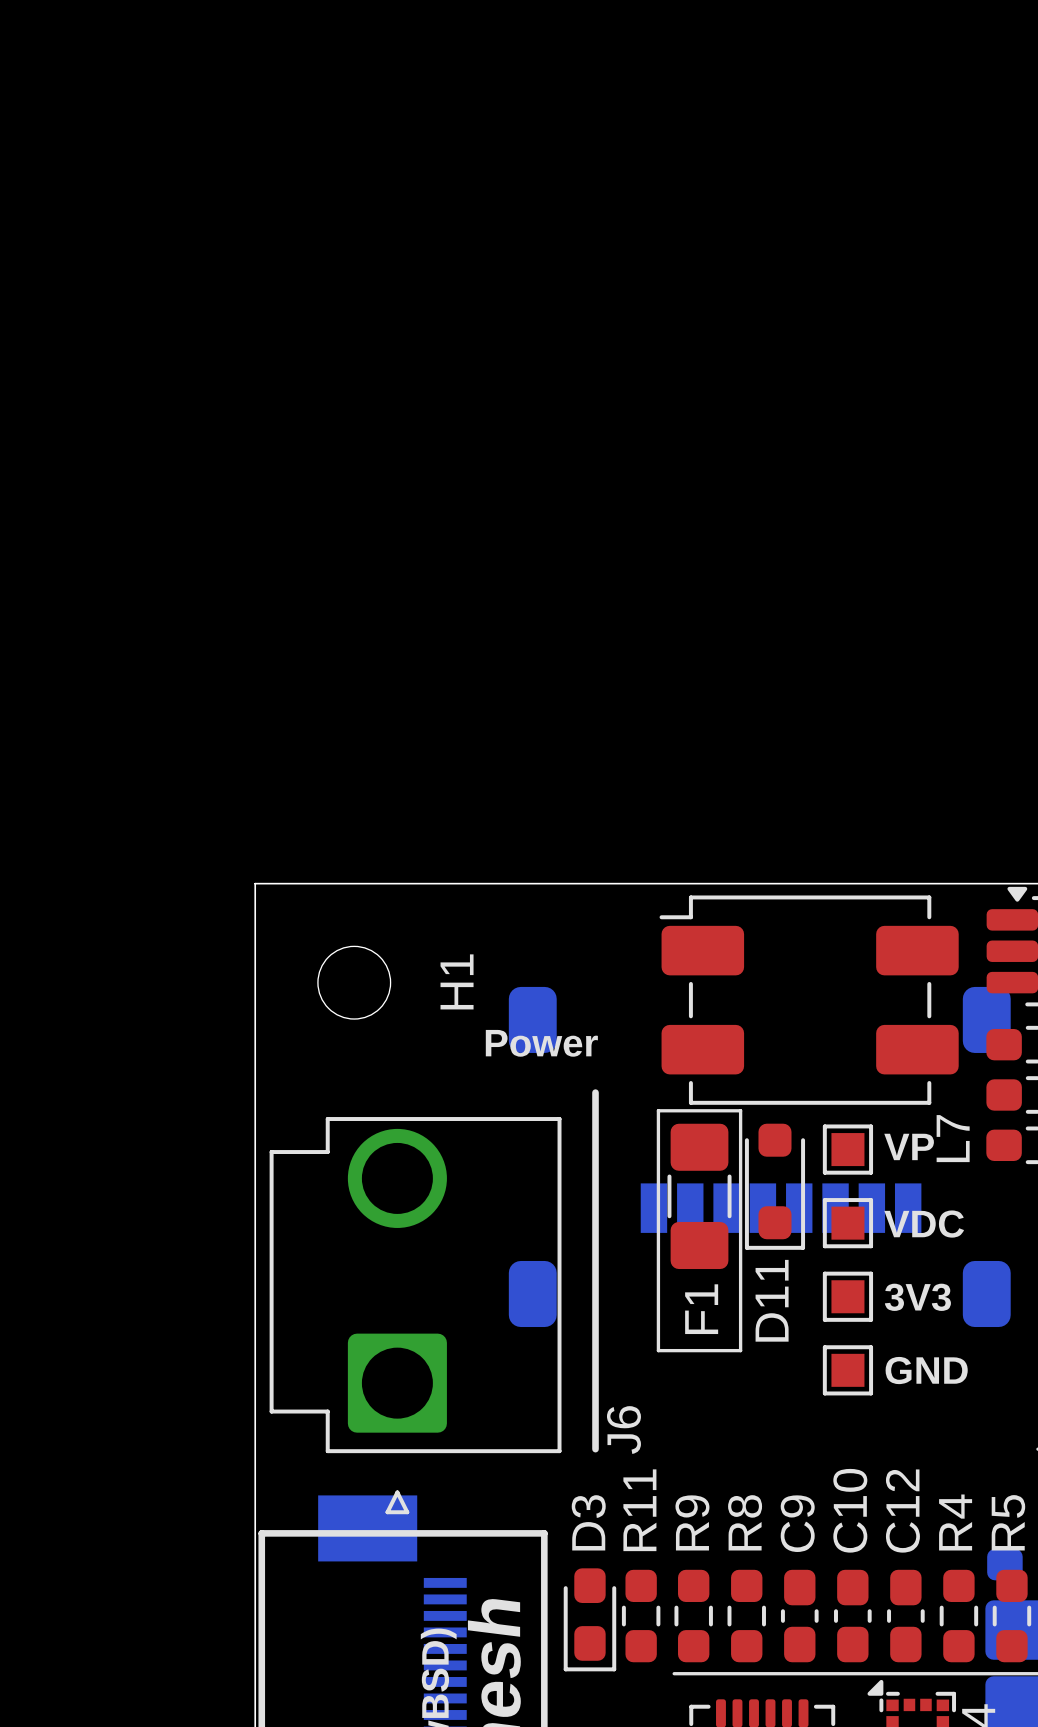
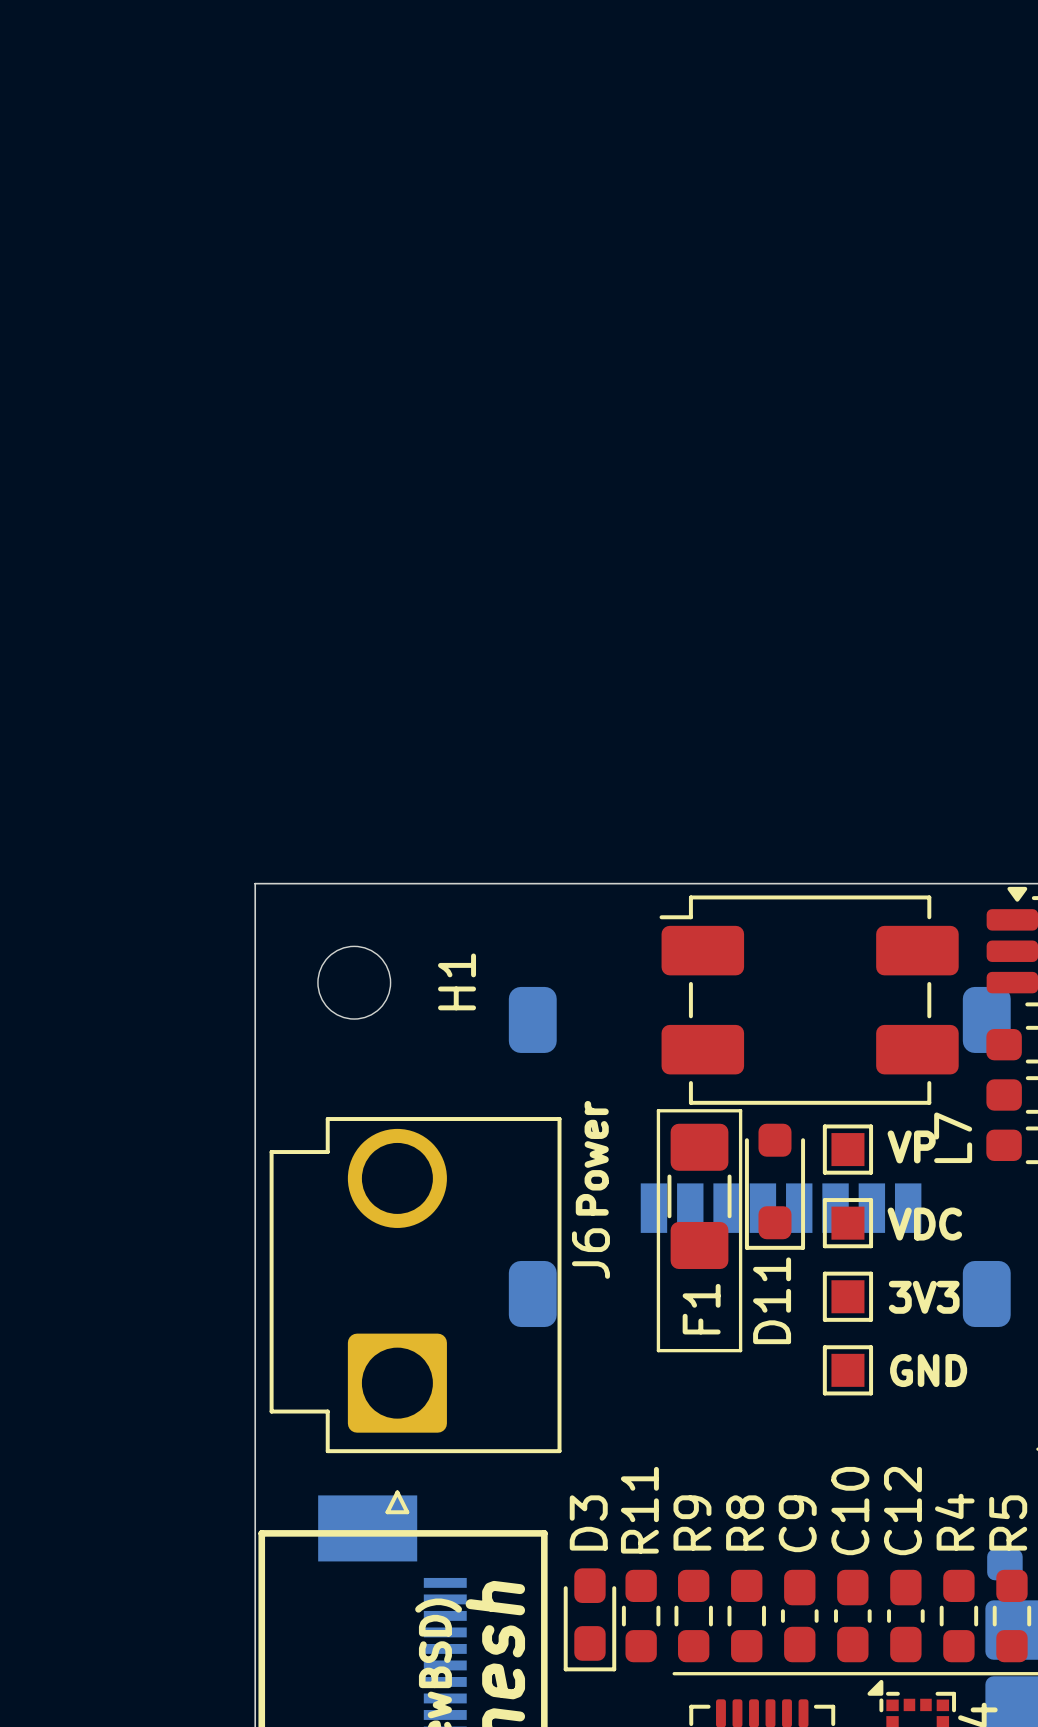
text rotation: 0° (541, 1043) -> 90° counterclockwise (592, 1158)
line: (595, 1092) (595, 1449) -> none
J6 name position: J6 (623, 1430) -> J6 (590, 1253)

